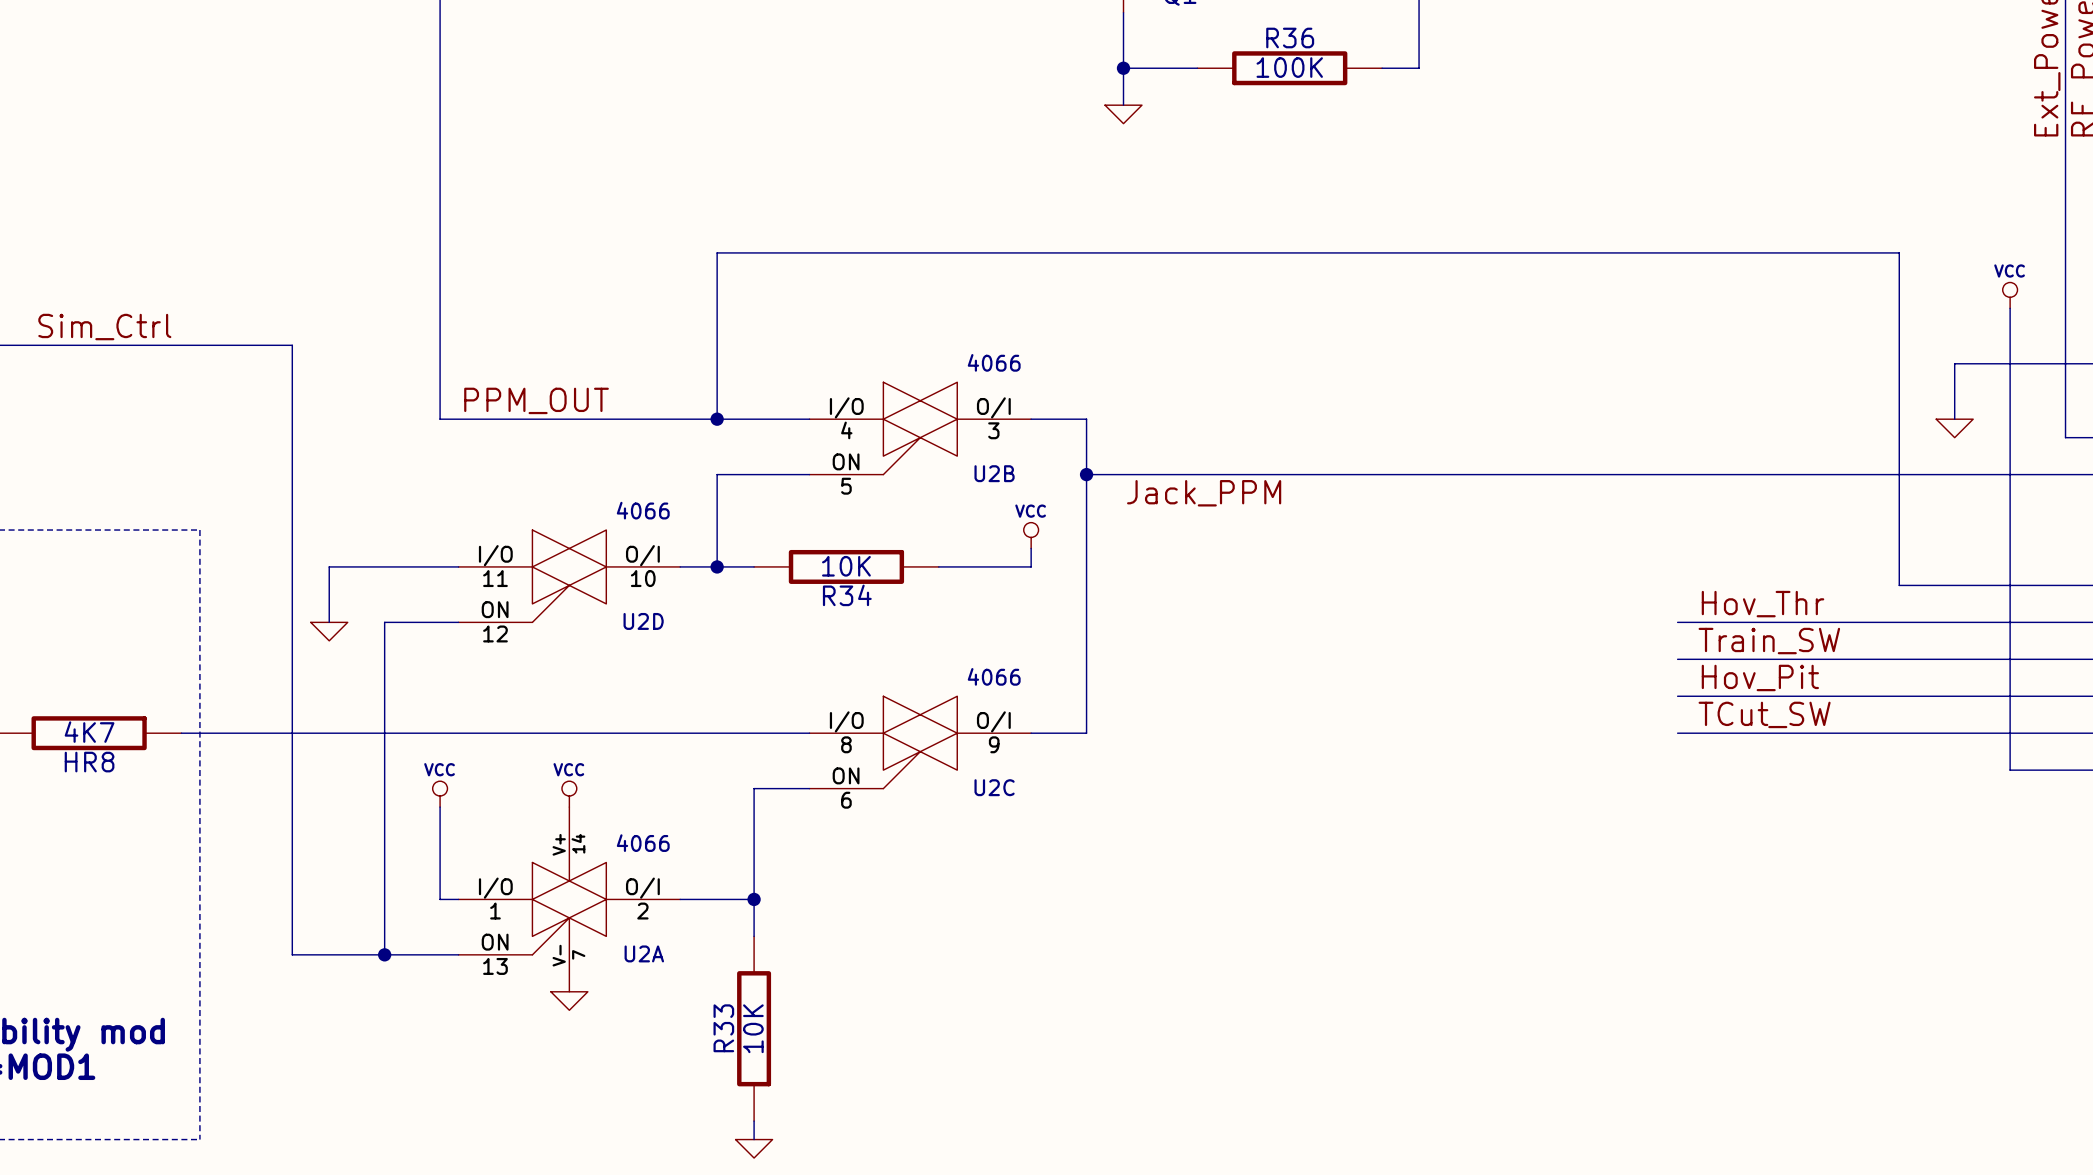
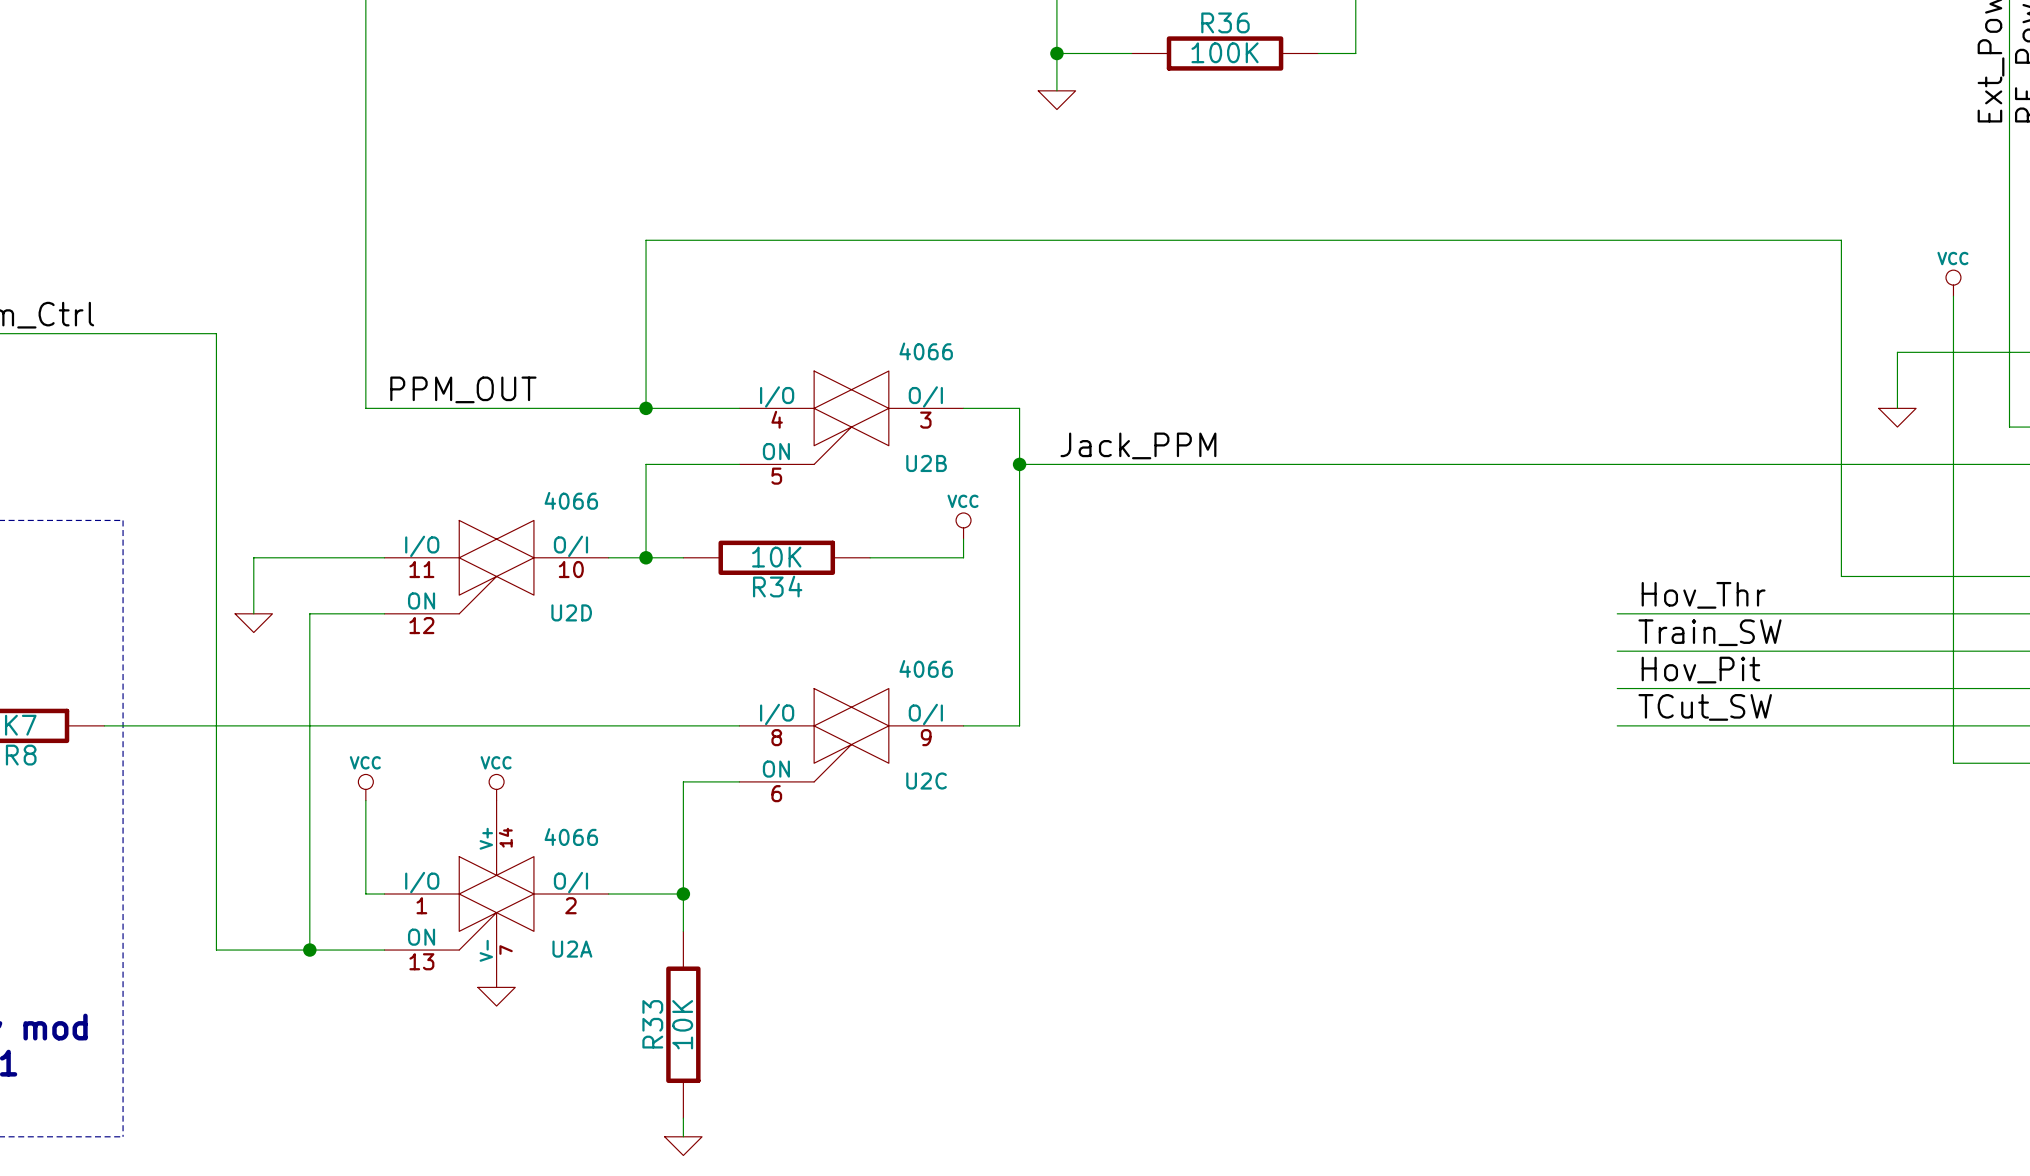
label position: Jack_PPM (1204, 493) -> Jack_PPM (1138, 445)

